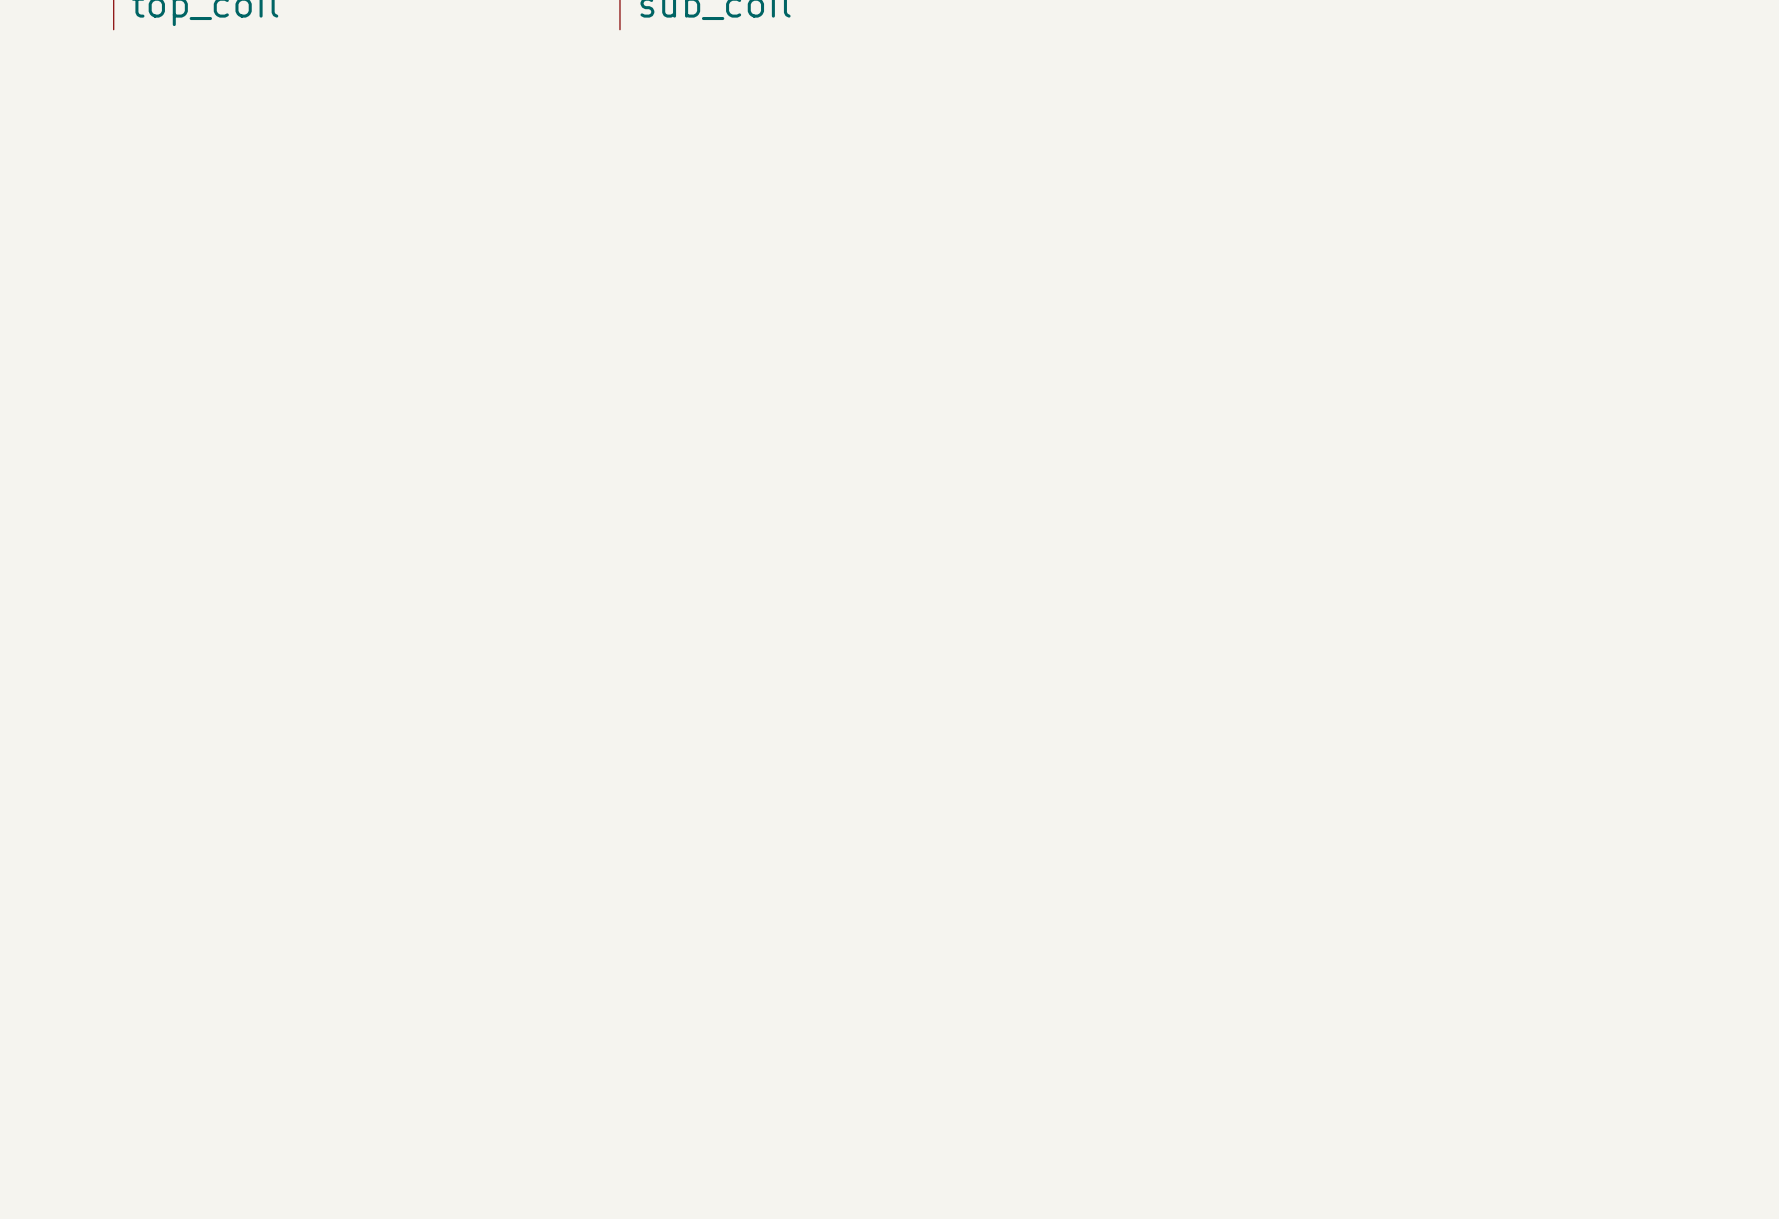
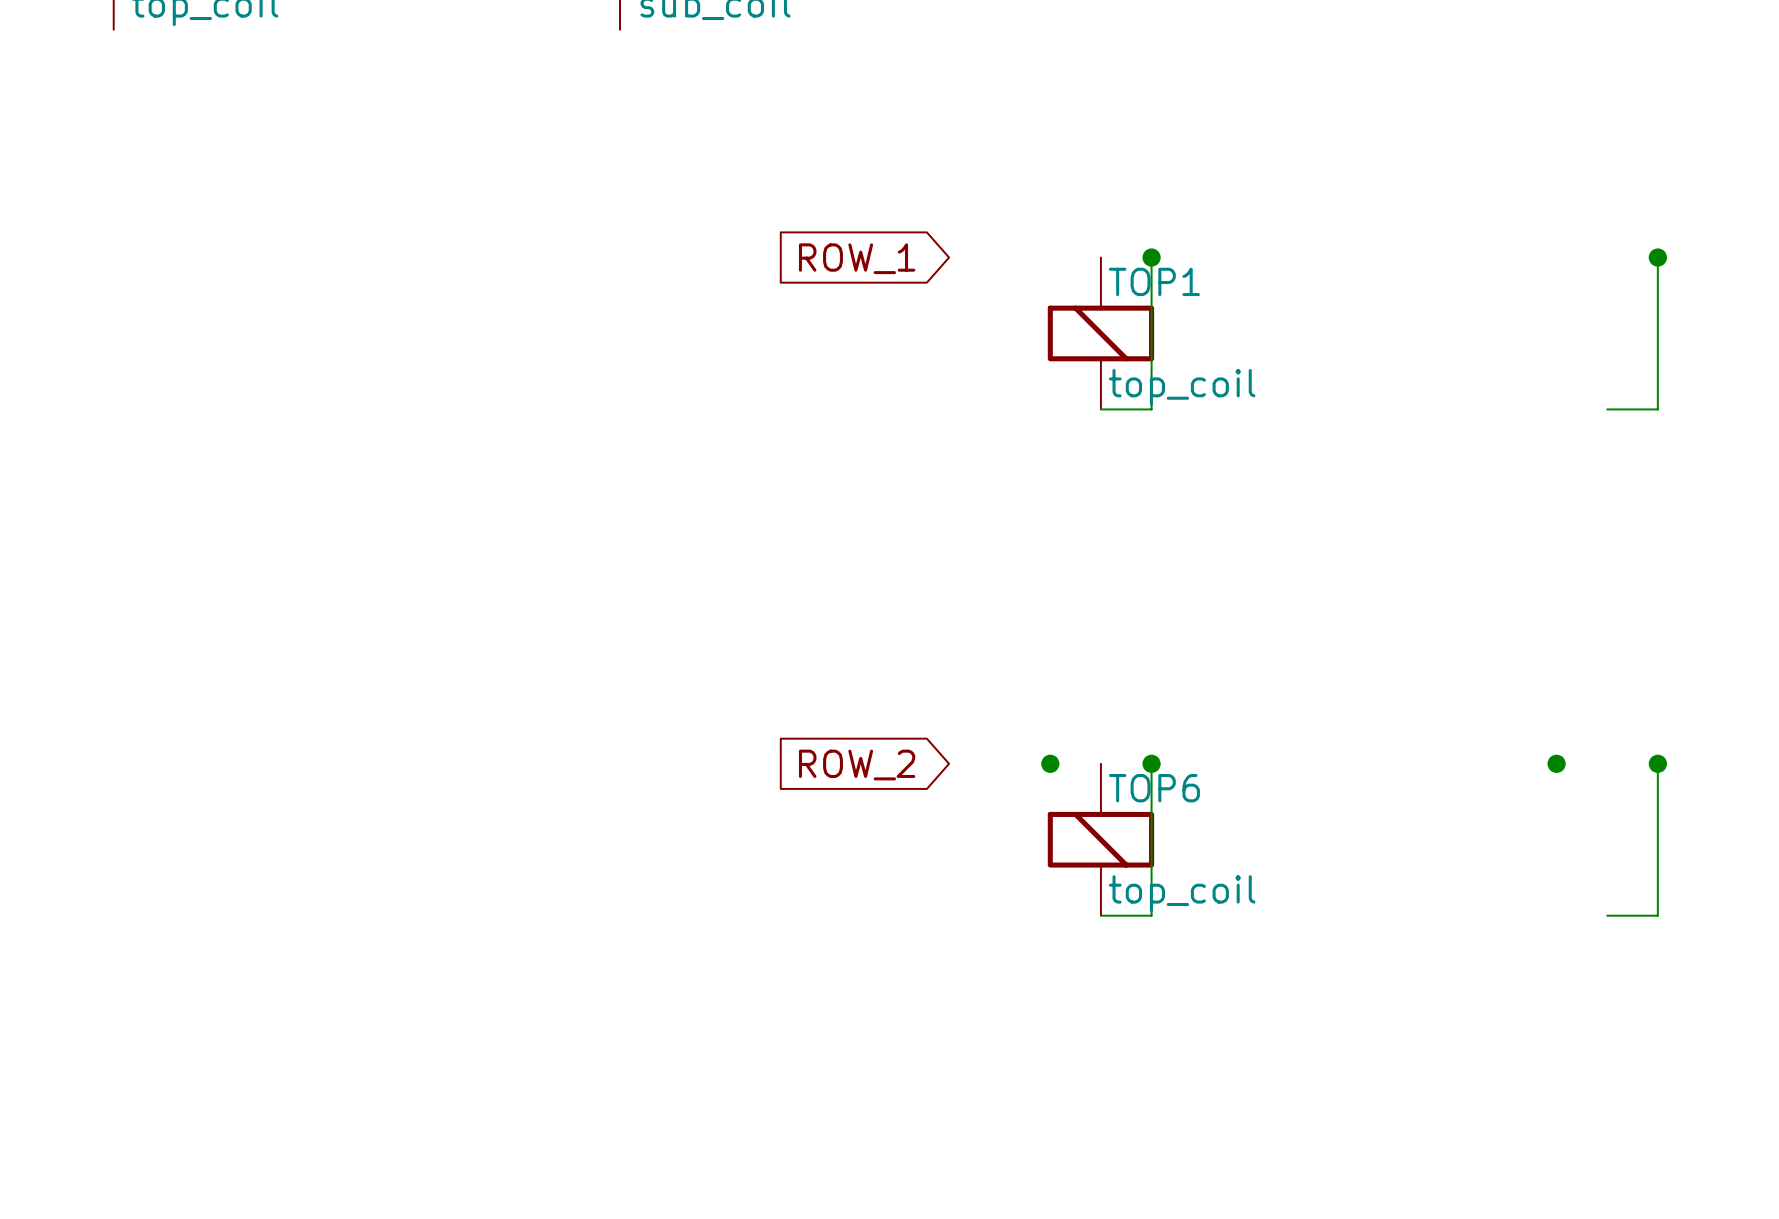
wire: none -> (1151, 257) (1151, 409) (1100, 409)
junction: none -> (1151, 257)
wire: none -> (1657, 257) (1657, 409) (1607, 409)
junction: none -> (1657, 257)
global label: none -> ROW_1 (857, 258)
TOP1: none -> top_coil (1100, 333)
junction: none -> (1050, 763)
wire: none -> (1151, 763) (1151, 915) (1100, 915)
junction: none -> (1151, 763)
junction: none -> (1556, 763)
wire: none -> (1657, 763) (1657, 915) (1607, 915)
junction: none -> (1657, 763)
global label: none -> ROW_2 (857, 765)
TOP6: none -> top_coil (1100, 839)

